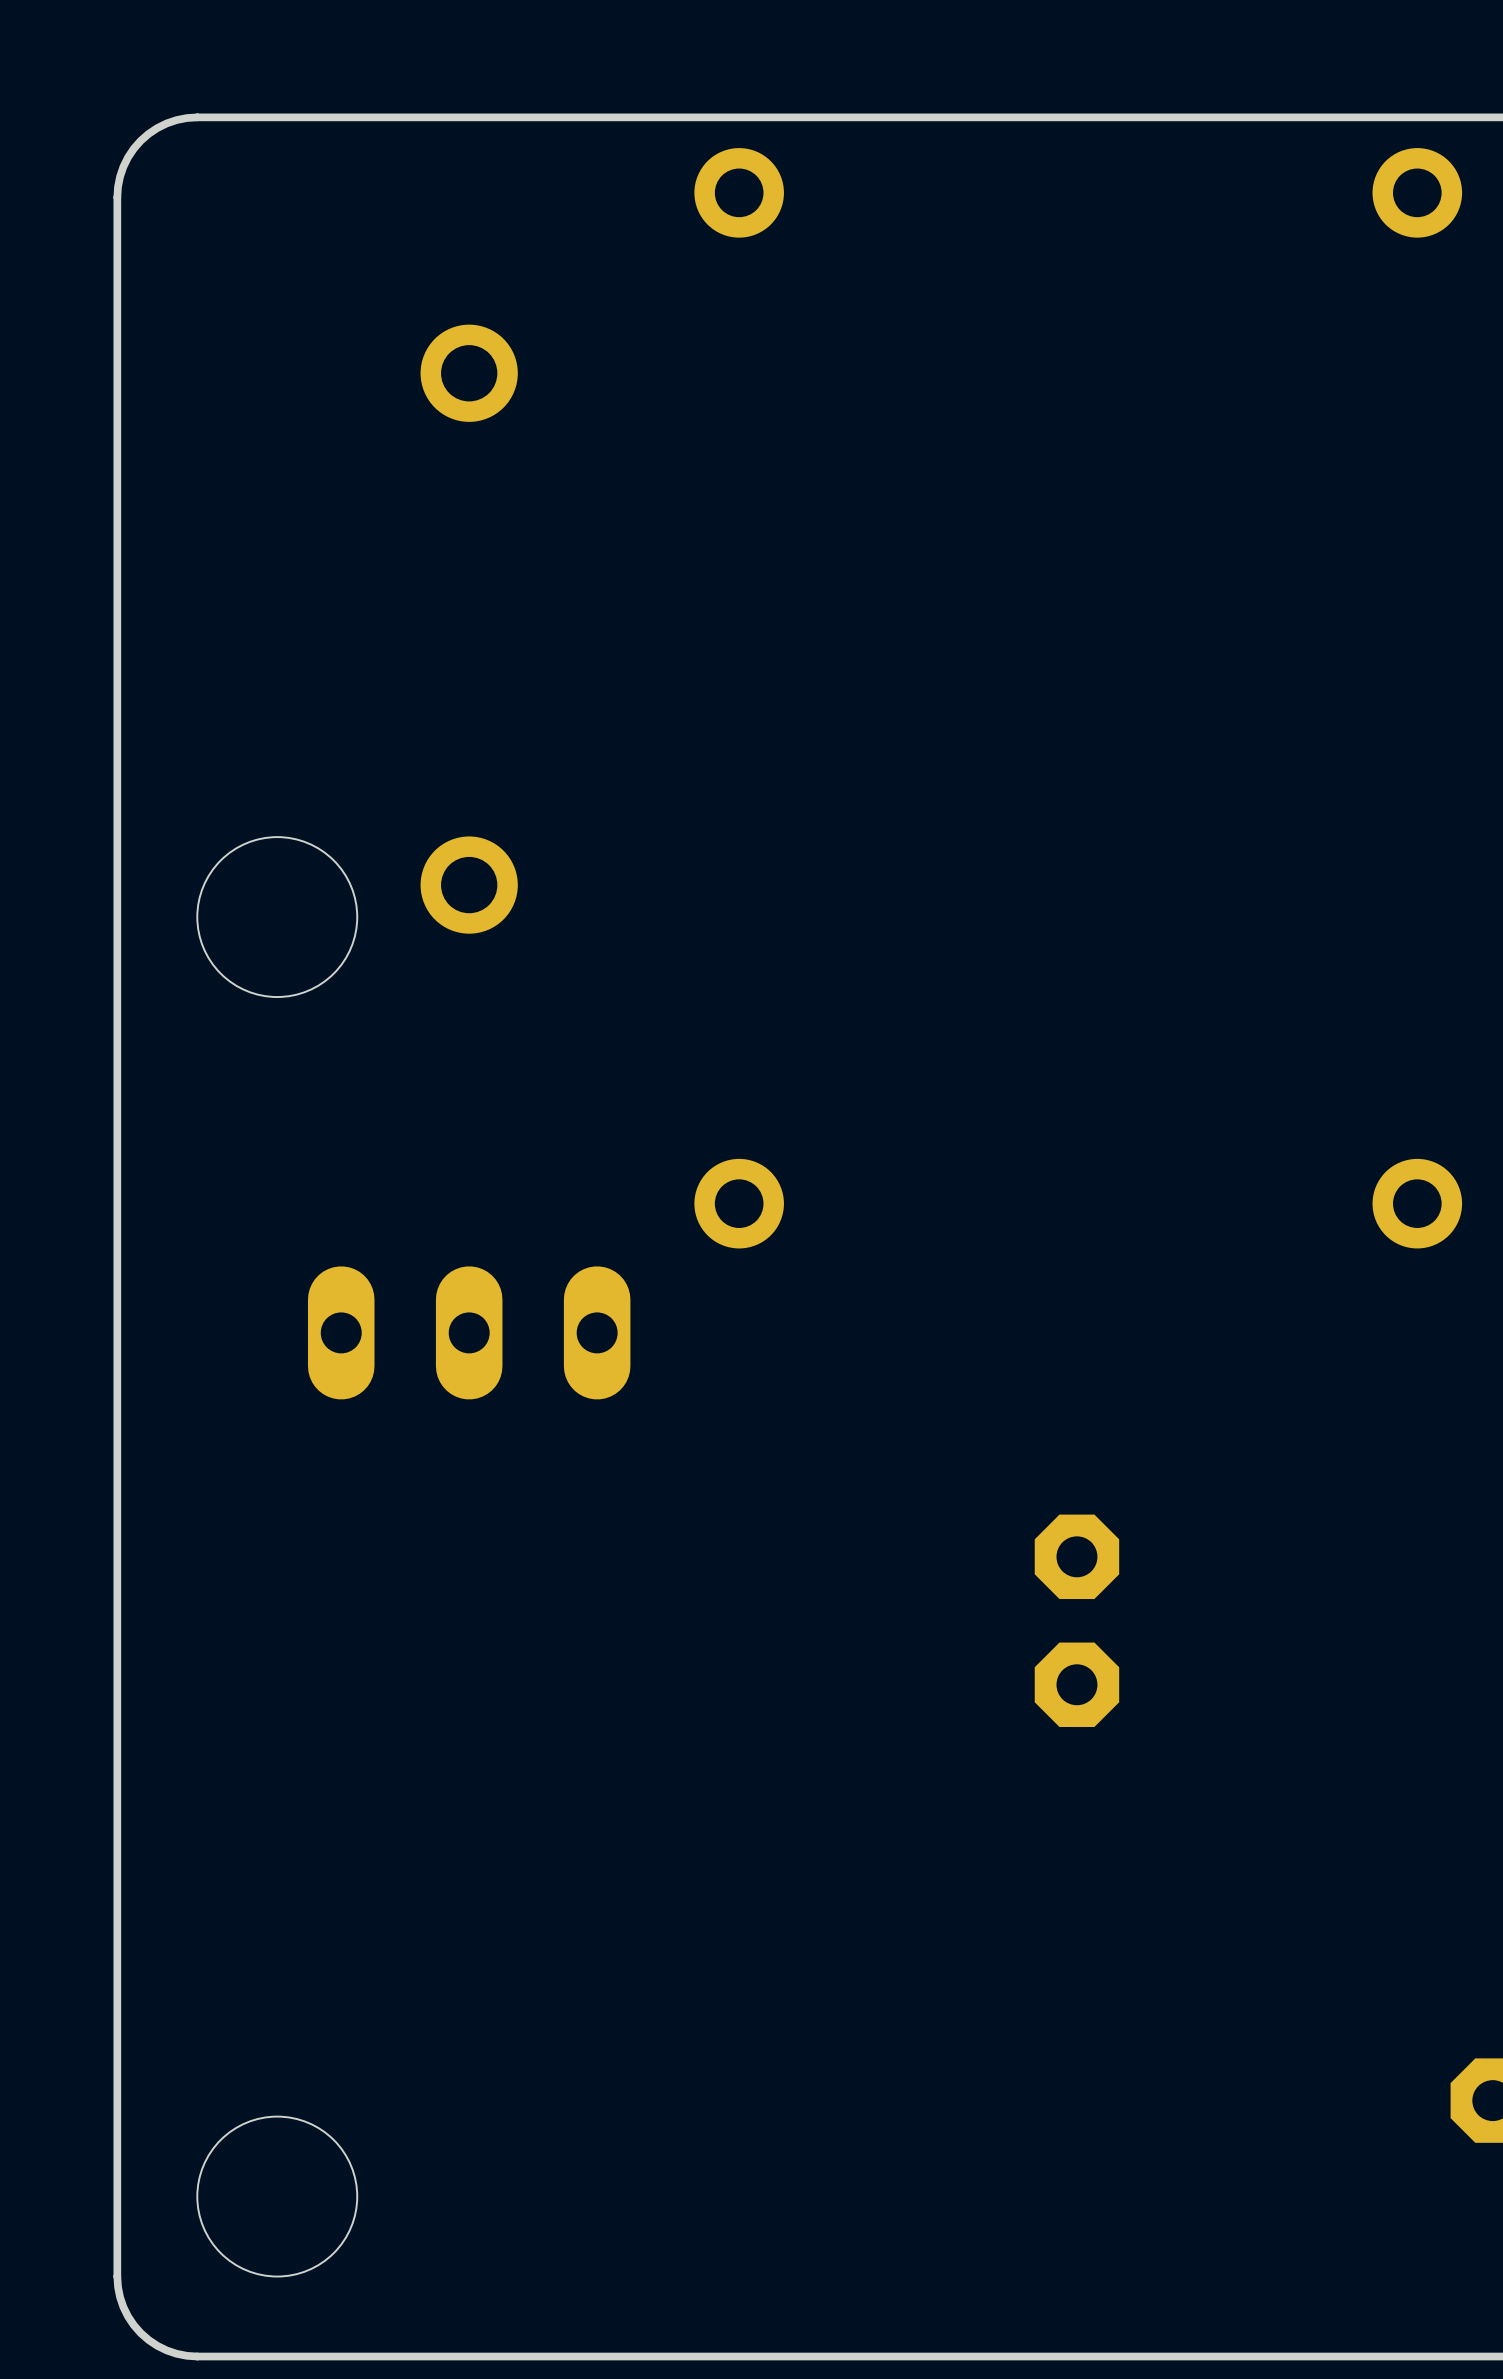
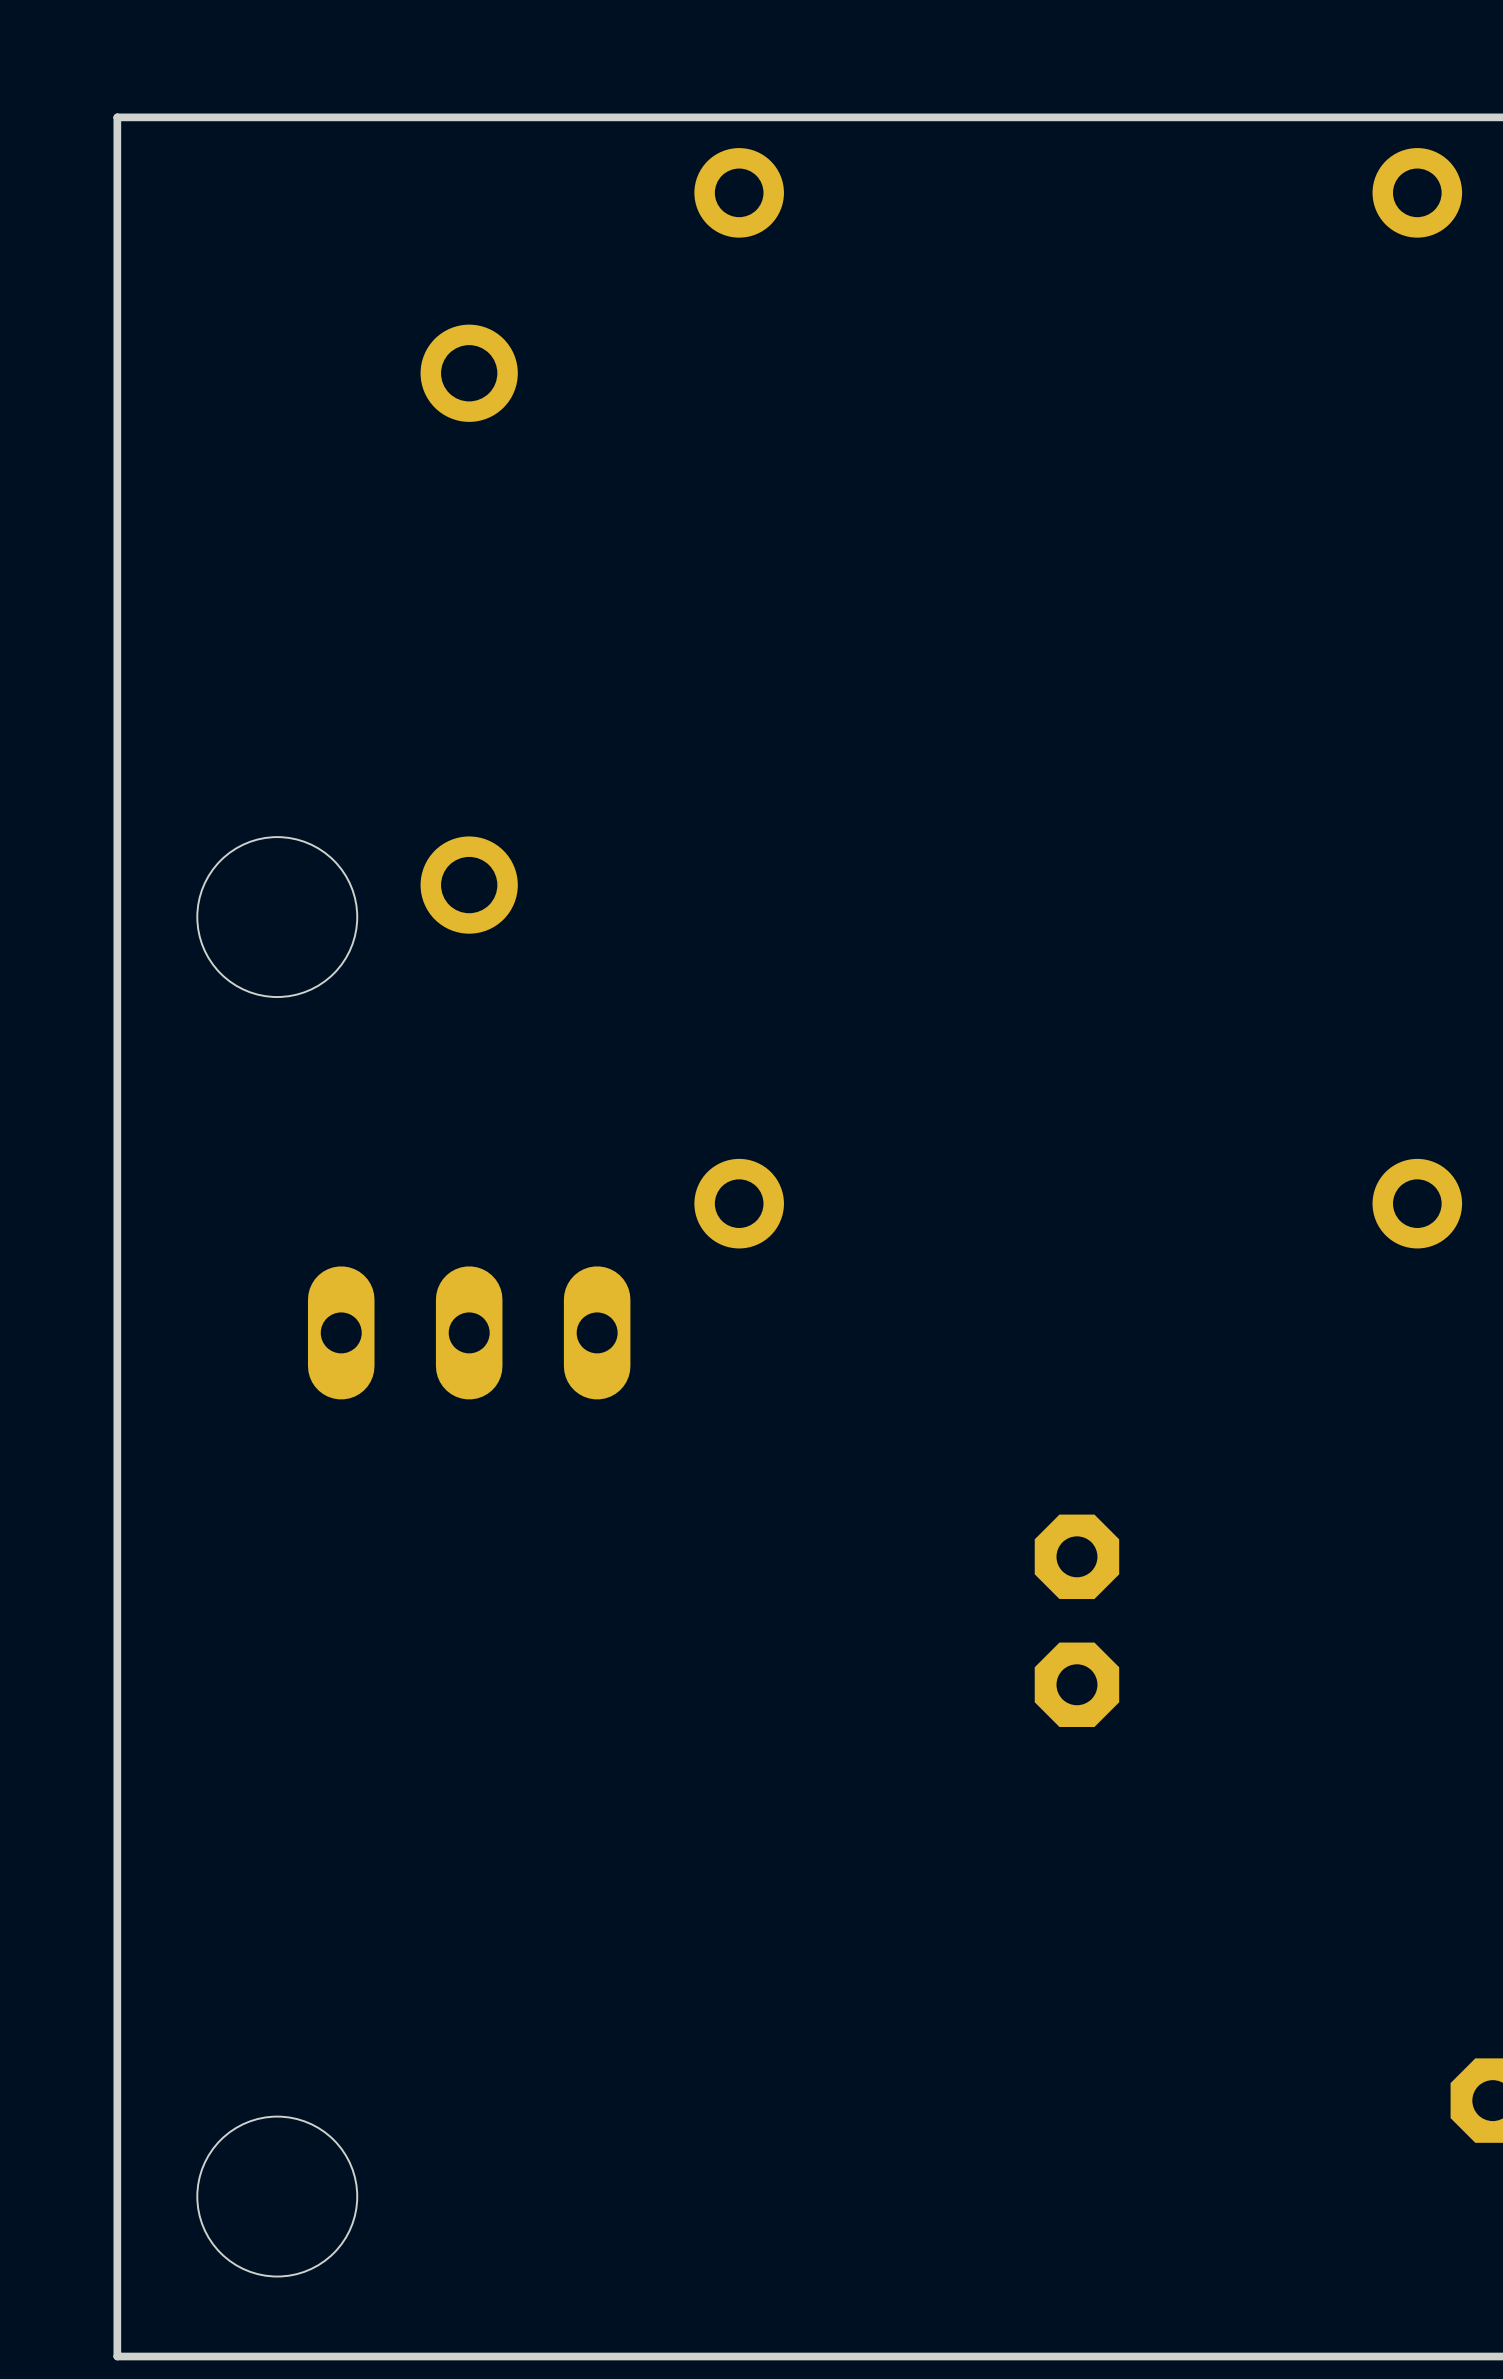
board edge: (197, 117) (166, 123) (140, 140) (123, 166) (117, 197) -> (197, 117) (117, 117) (117, 197)
board edge: (117, 2276) (123, 2307) (140, 2333) (166, 2350) (197, 2356) -> (117, 2276) (117, 2356) (197, 2356)

